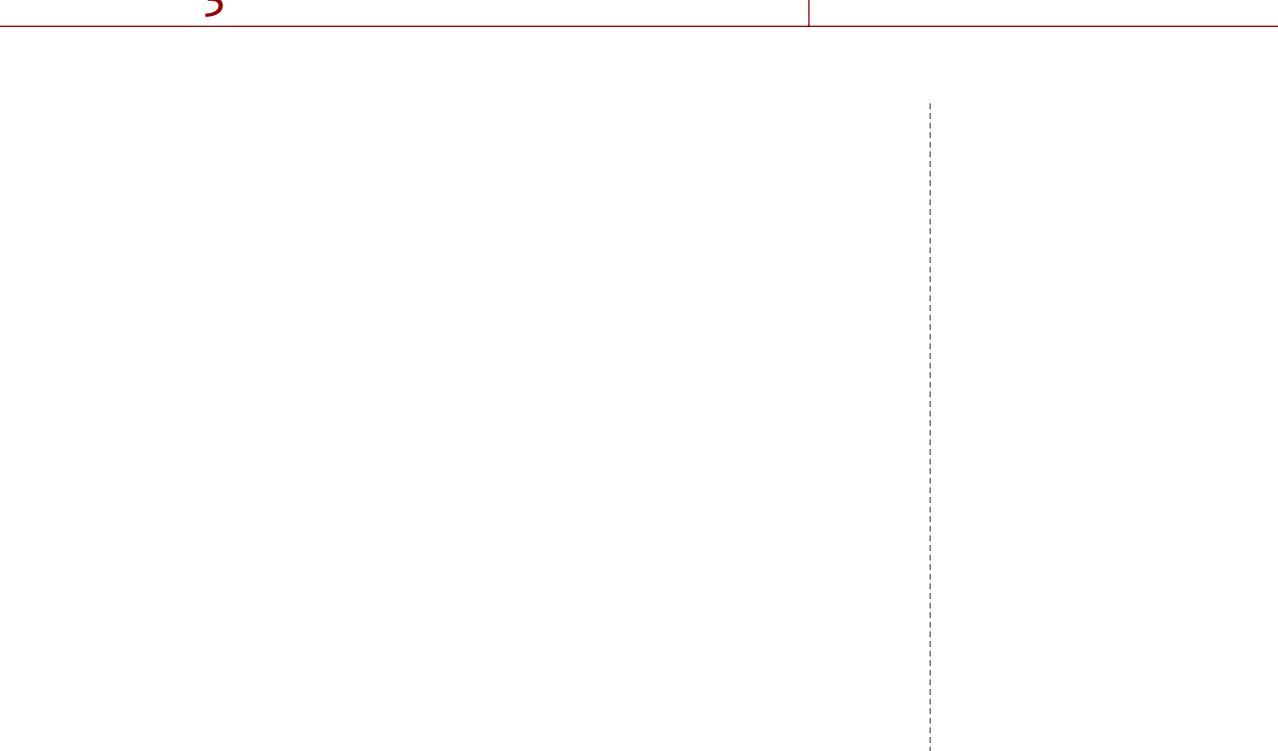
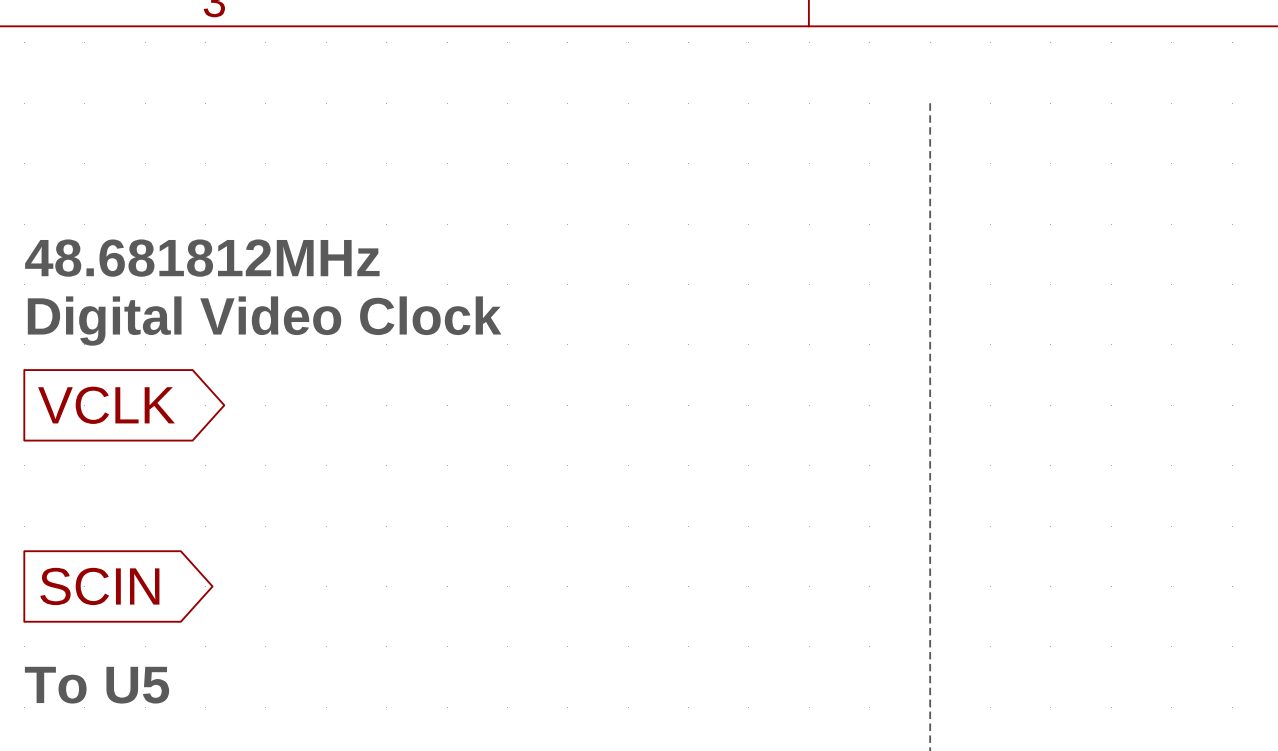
text: none -> 48.681812MHz (202, 258)
text: none -> Digital Video Clock (264, 321)
global label: none -> VCLK (106, 405)
global label: none -> SCIN (99, 586)
text: none -> To U5 (97, 685)

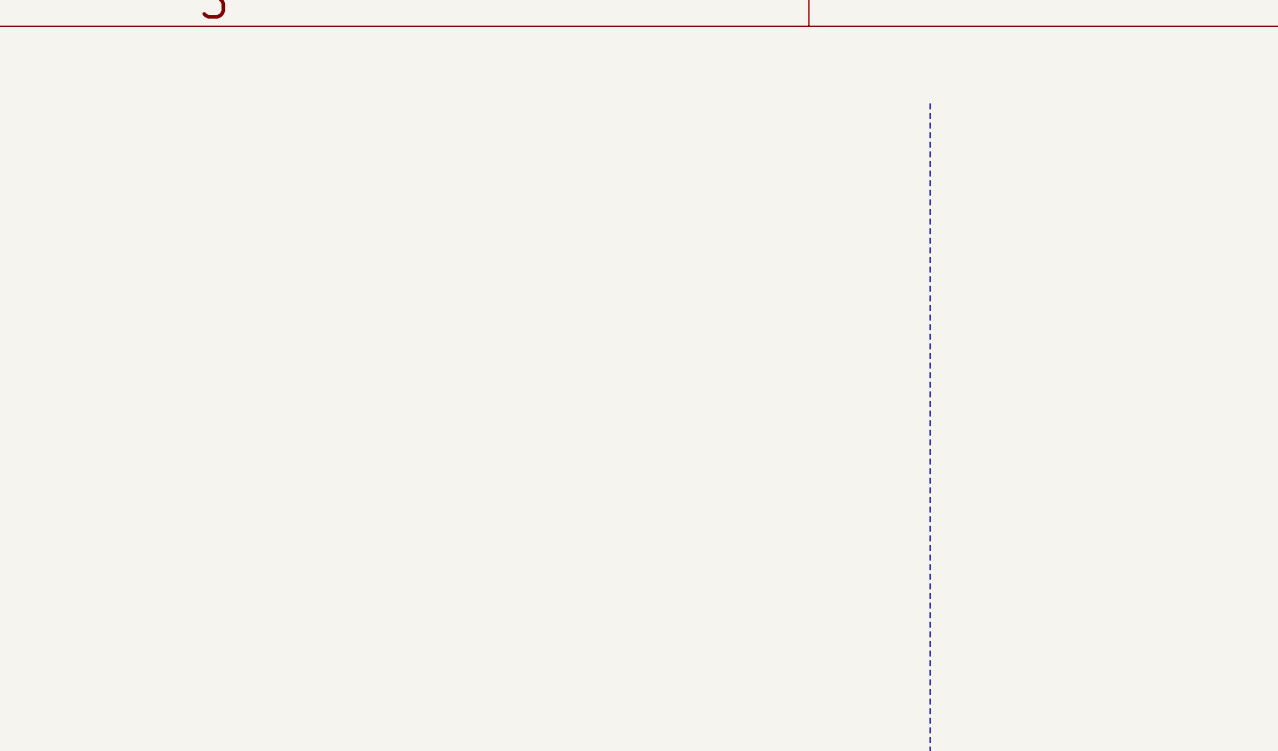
text: 48.681812MHz (202, 258) -> none
text: Digital Video Clock (264, 321) -> none
global label: VCLK (106, 405) -> none
global label: SCIN (99, 586) -> none
text: To U5 (97, 685) -> none

